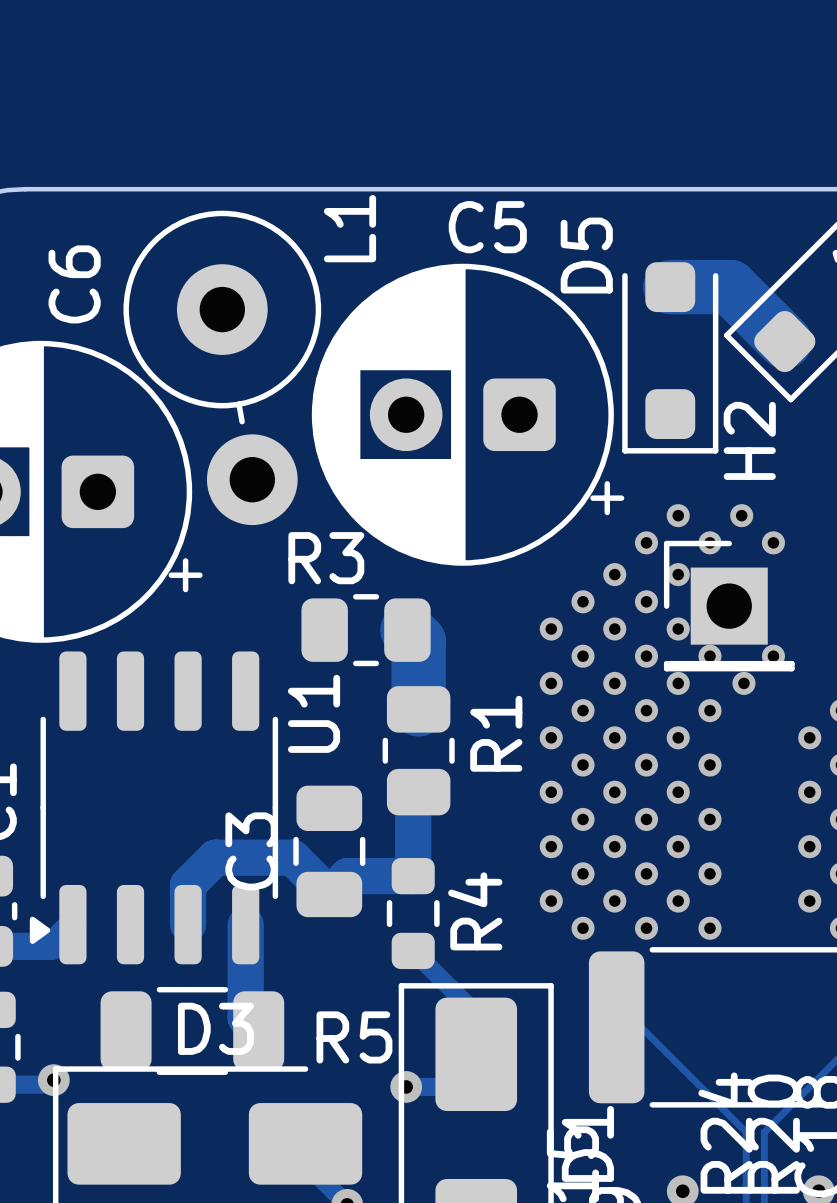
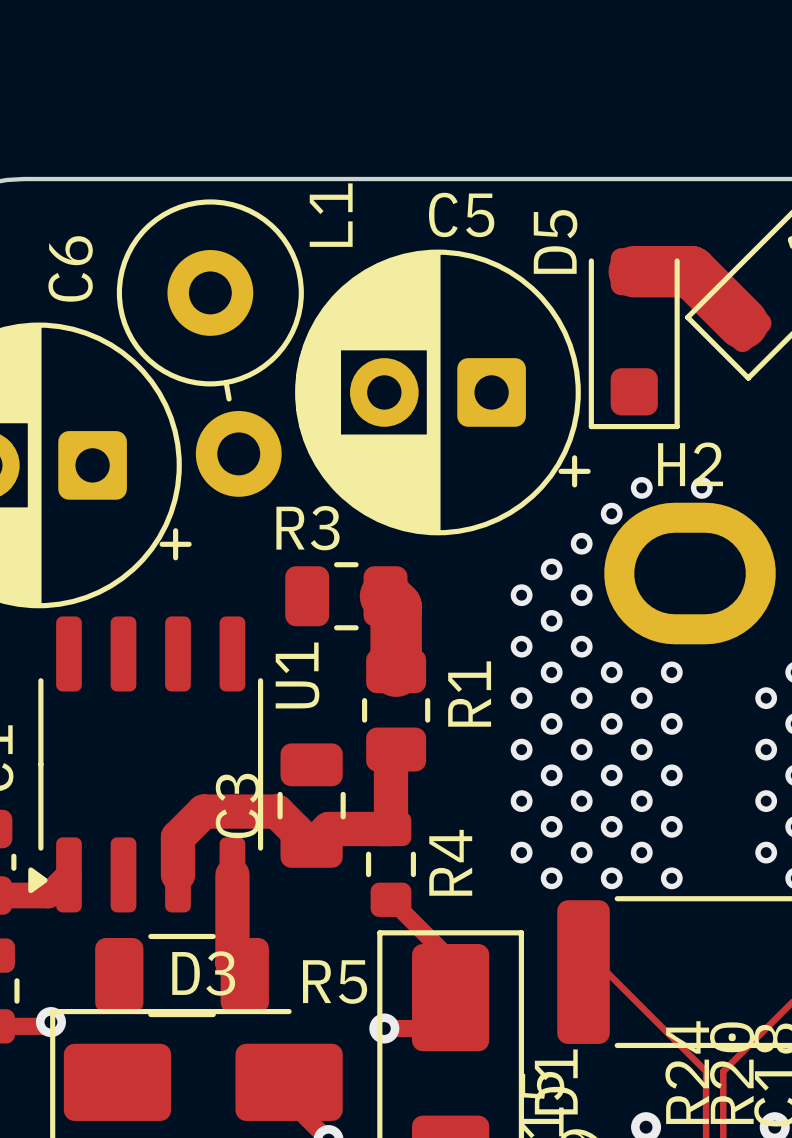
H2 footprint: [663, 540, 795, 672] -> [604, 502, 776, 645]
via: (709, 542) -> none
via: (773, 542) -> none
via: (678, 574) -> none
via: (646, 601) -> none
via: (678, 629) -> none
via: (646, 656) -> none
via: (709, 656) -> none
via: (773, 656) -> none
via: (678, 683) -> none
via: (743, 683) -> none

